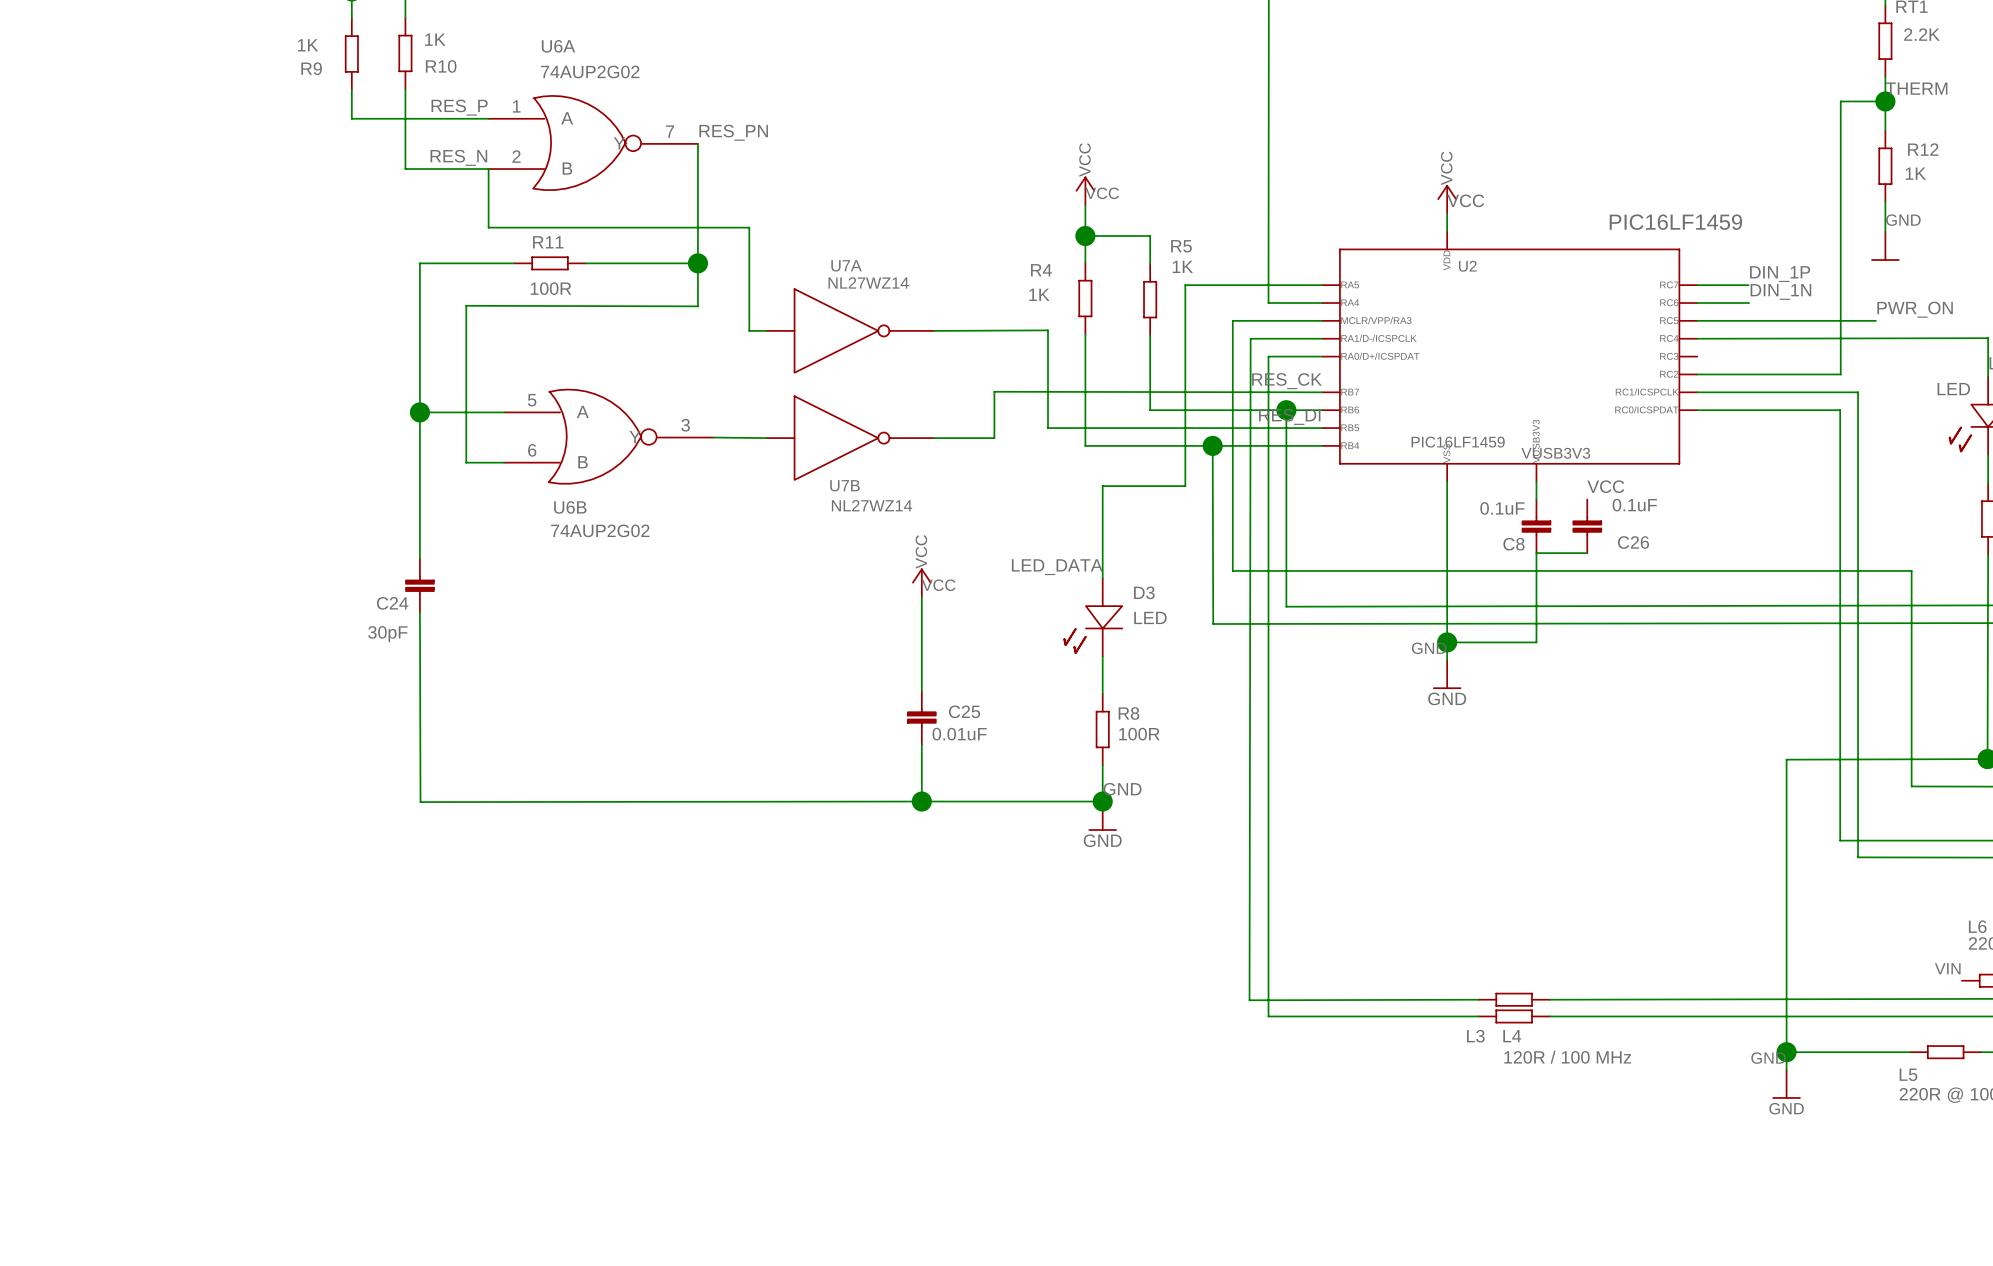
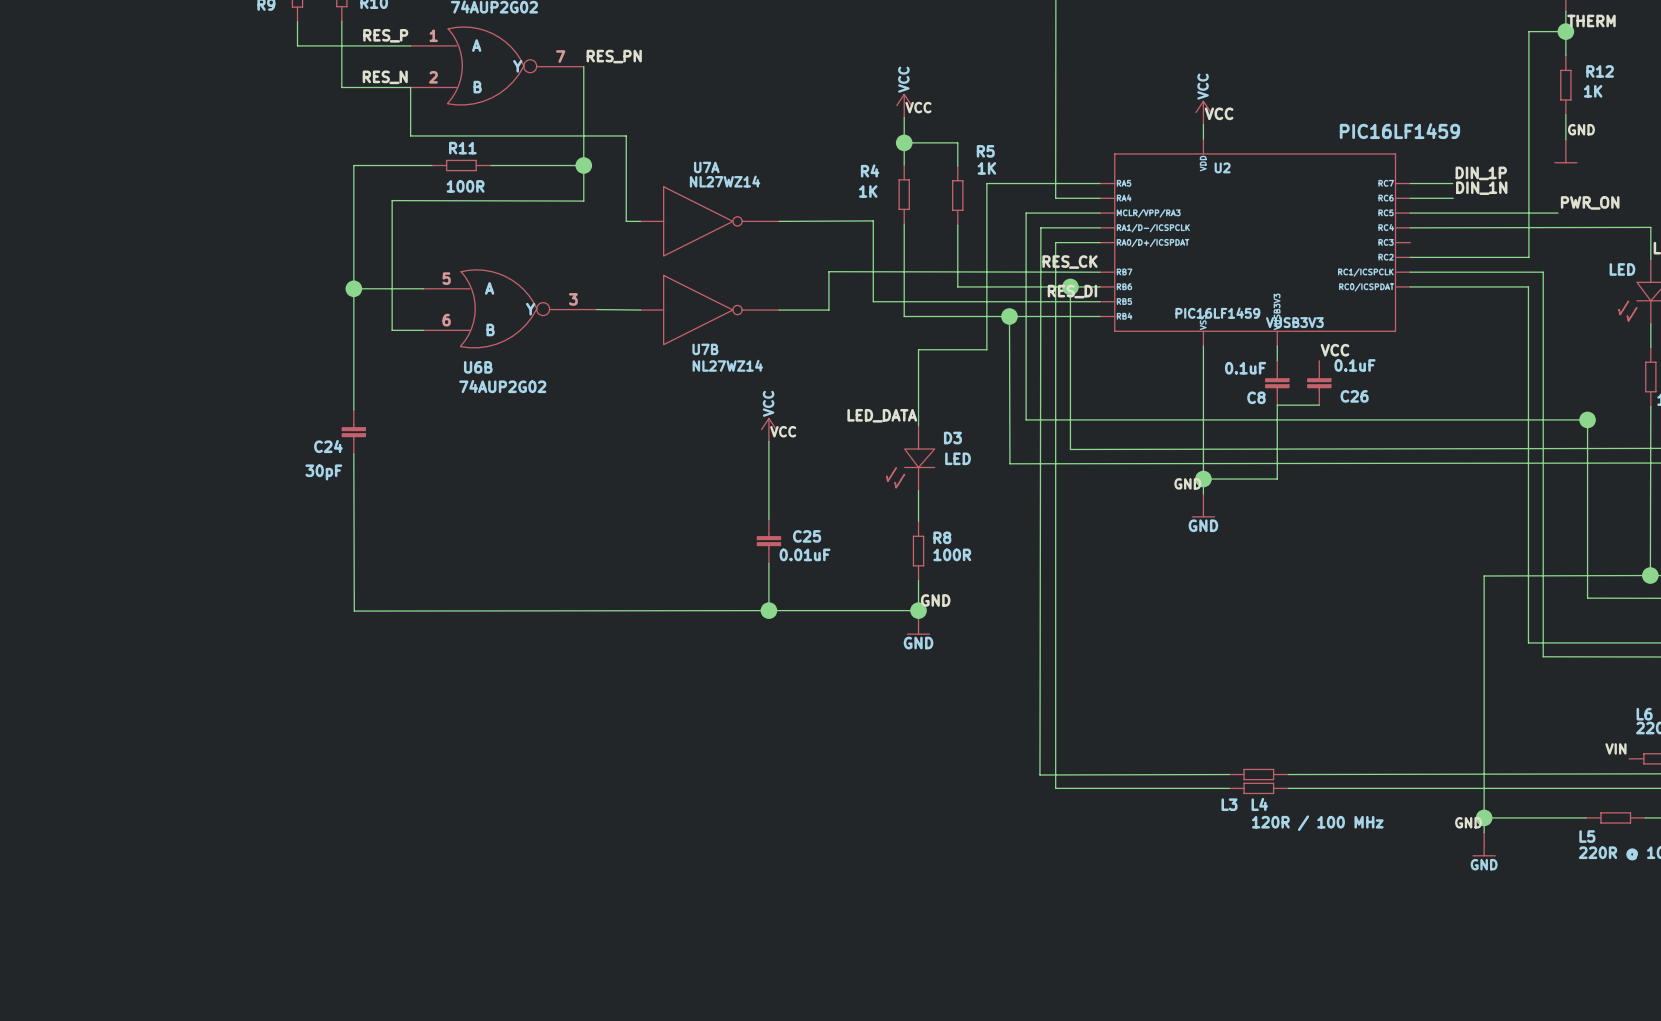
junction: none -> (1587, 419)

